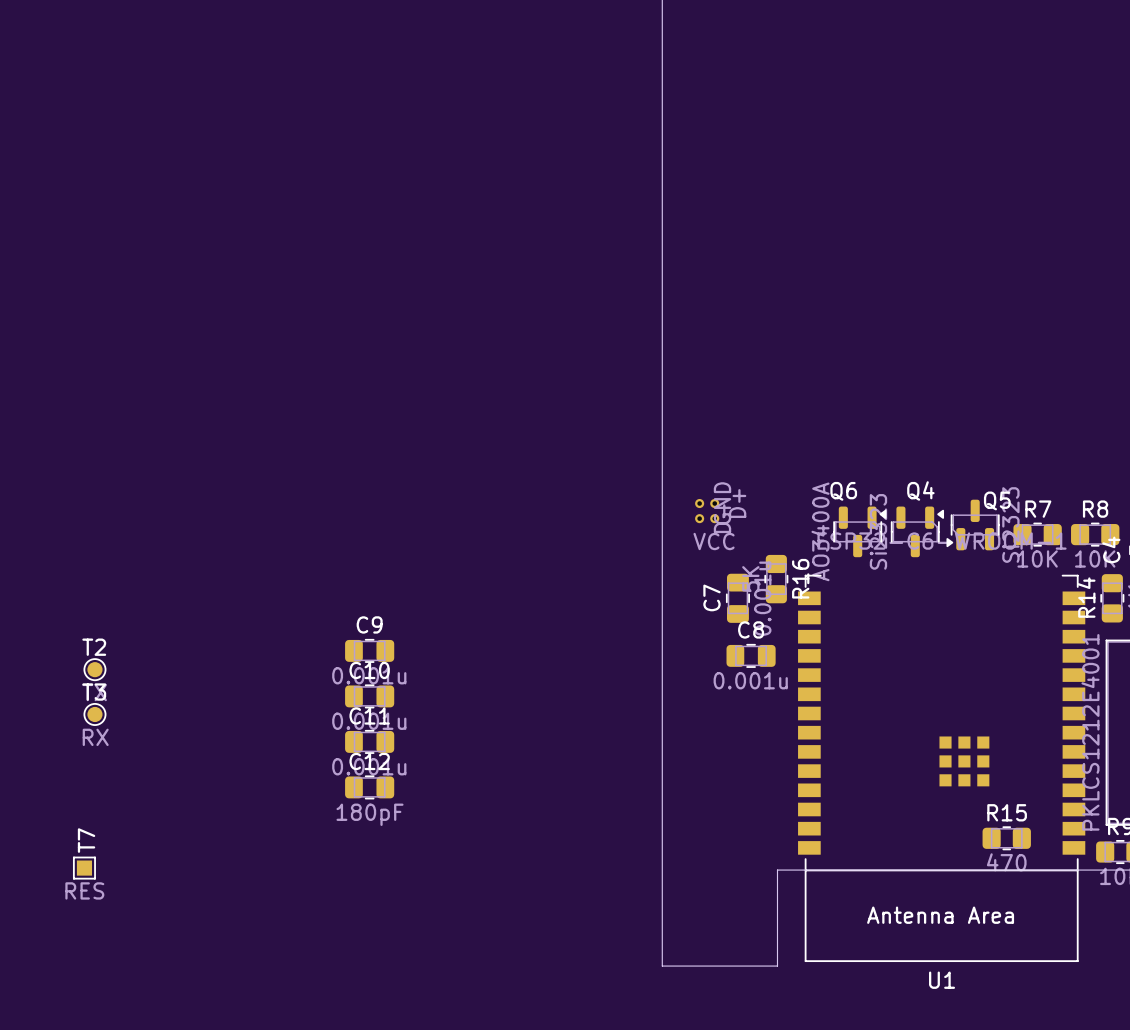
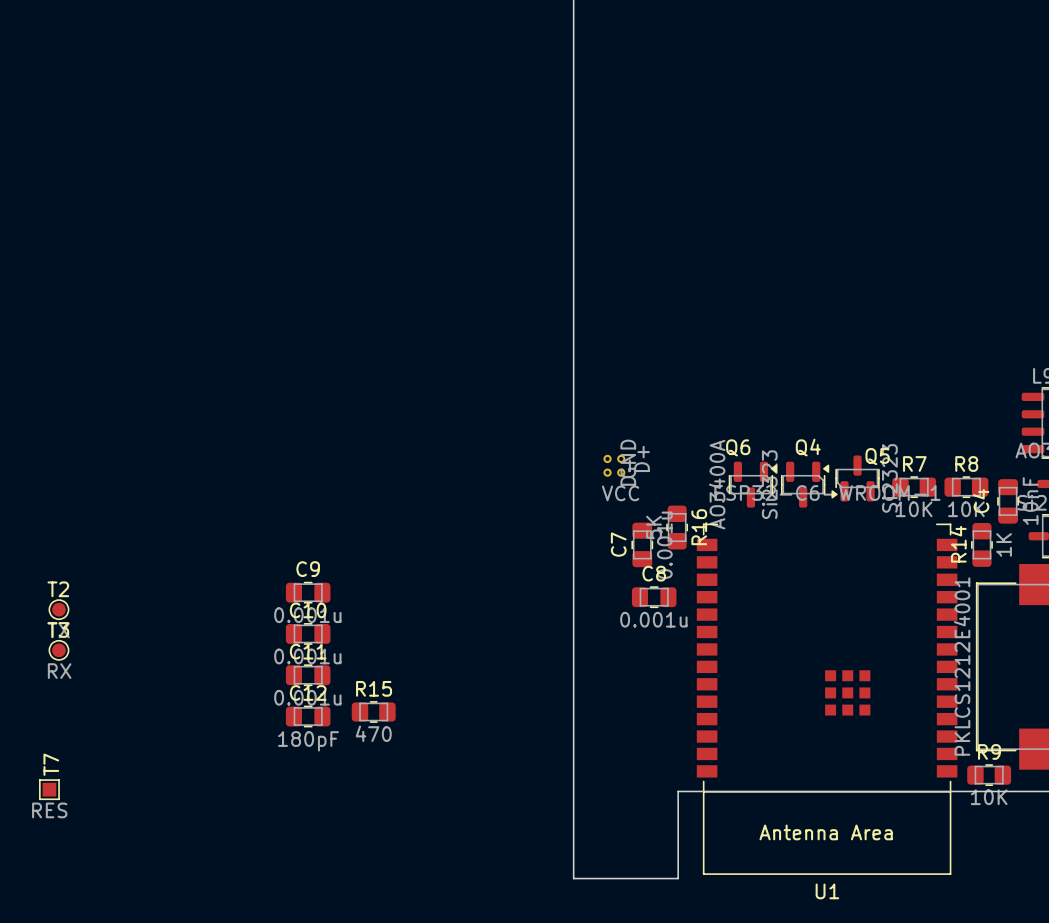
R15 position: (1006, 838) -> (373, 711)

